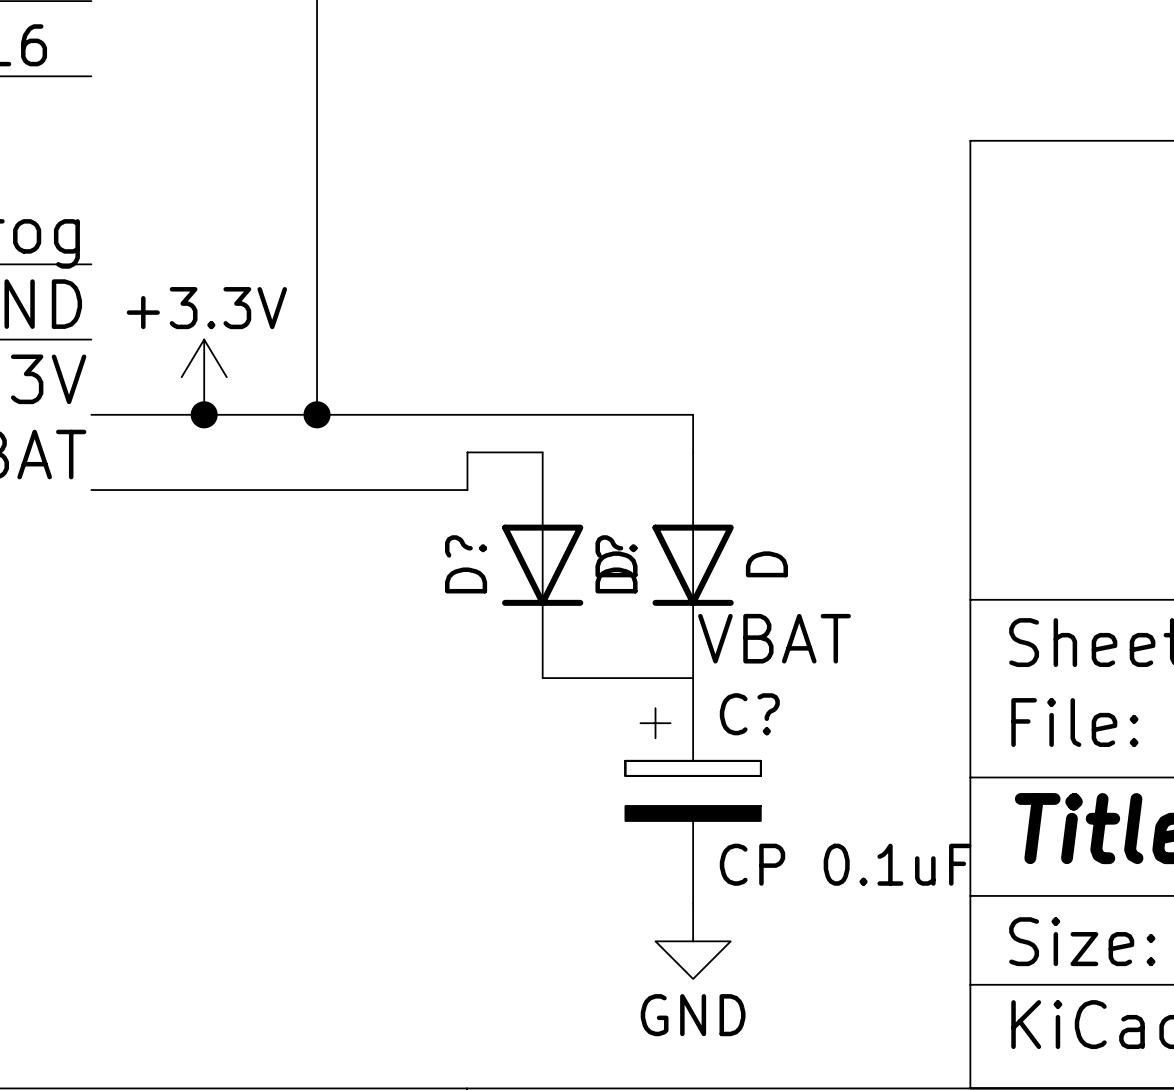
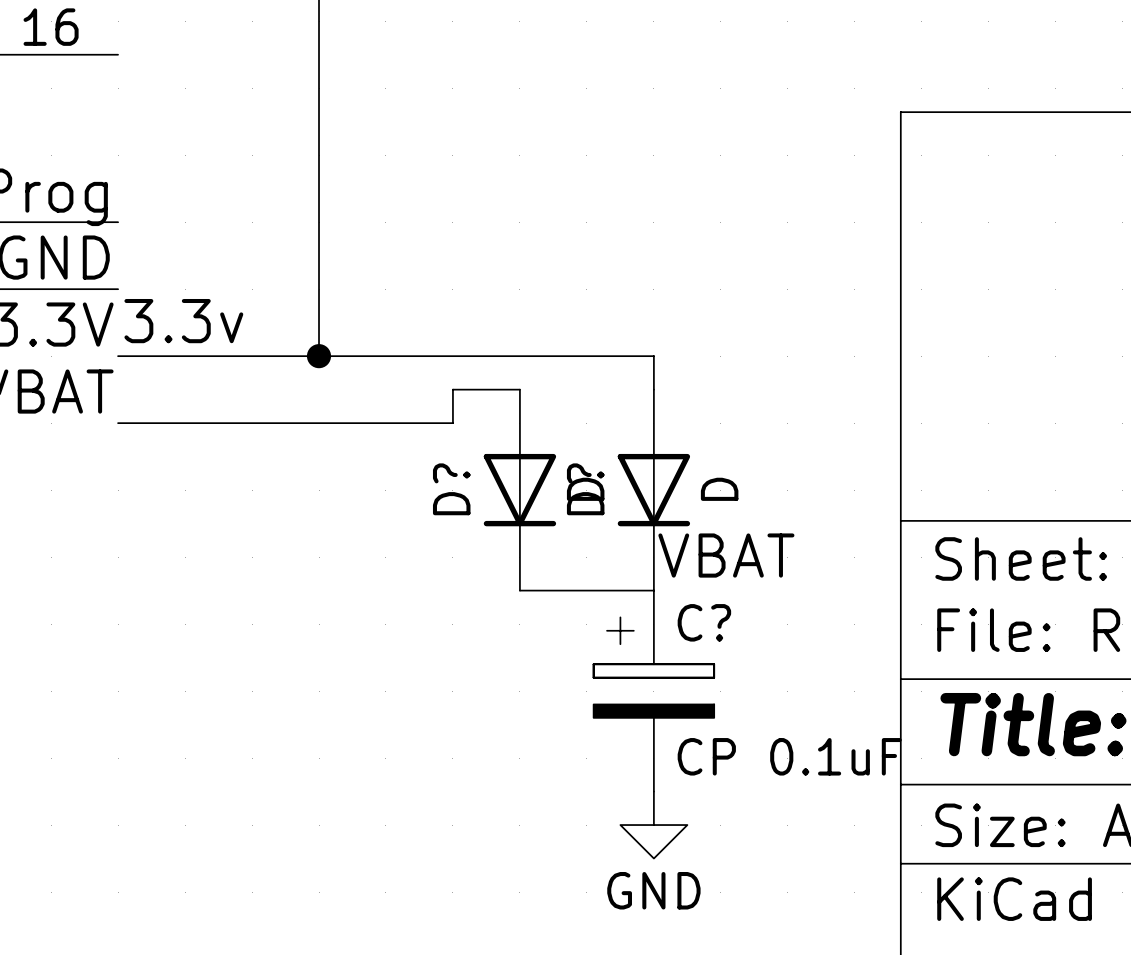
label: none -> 3.3v (183, 321)
power symbol: +3.3V (204, 377) -> none
junction: (204, 414) -> none

